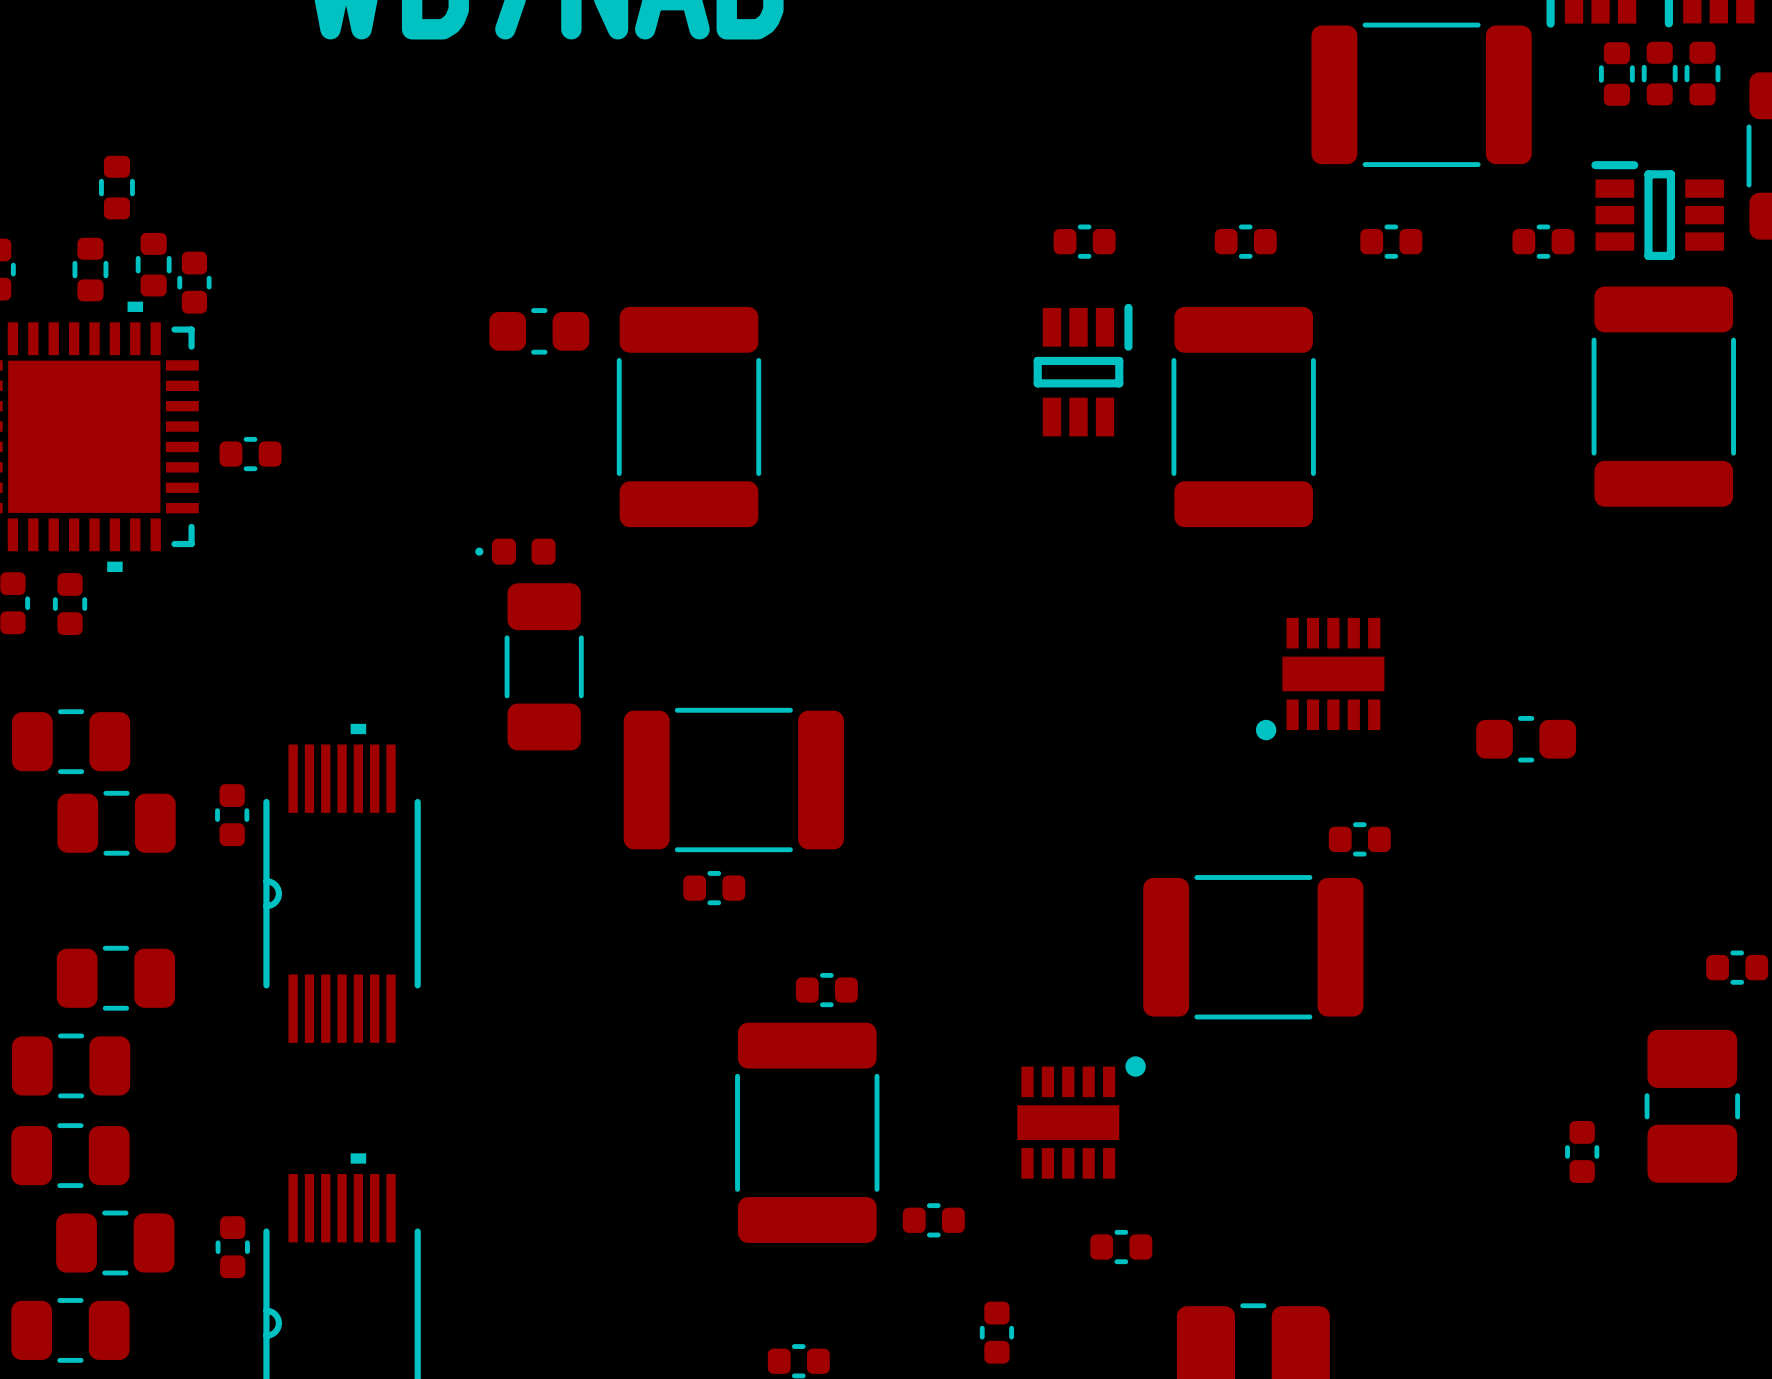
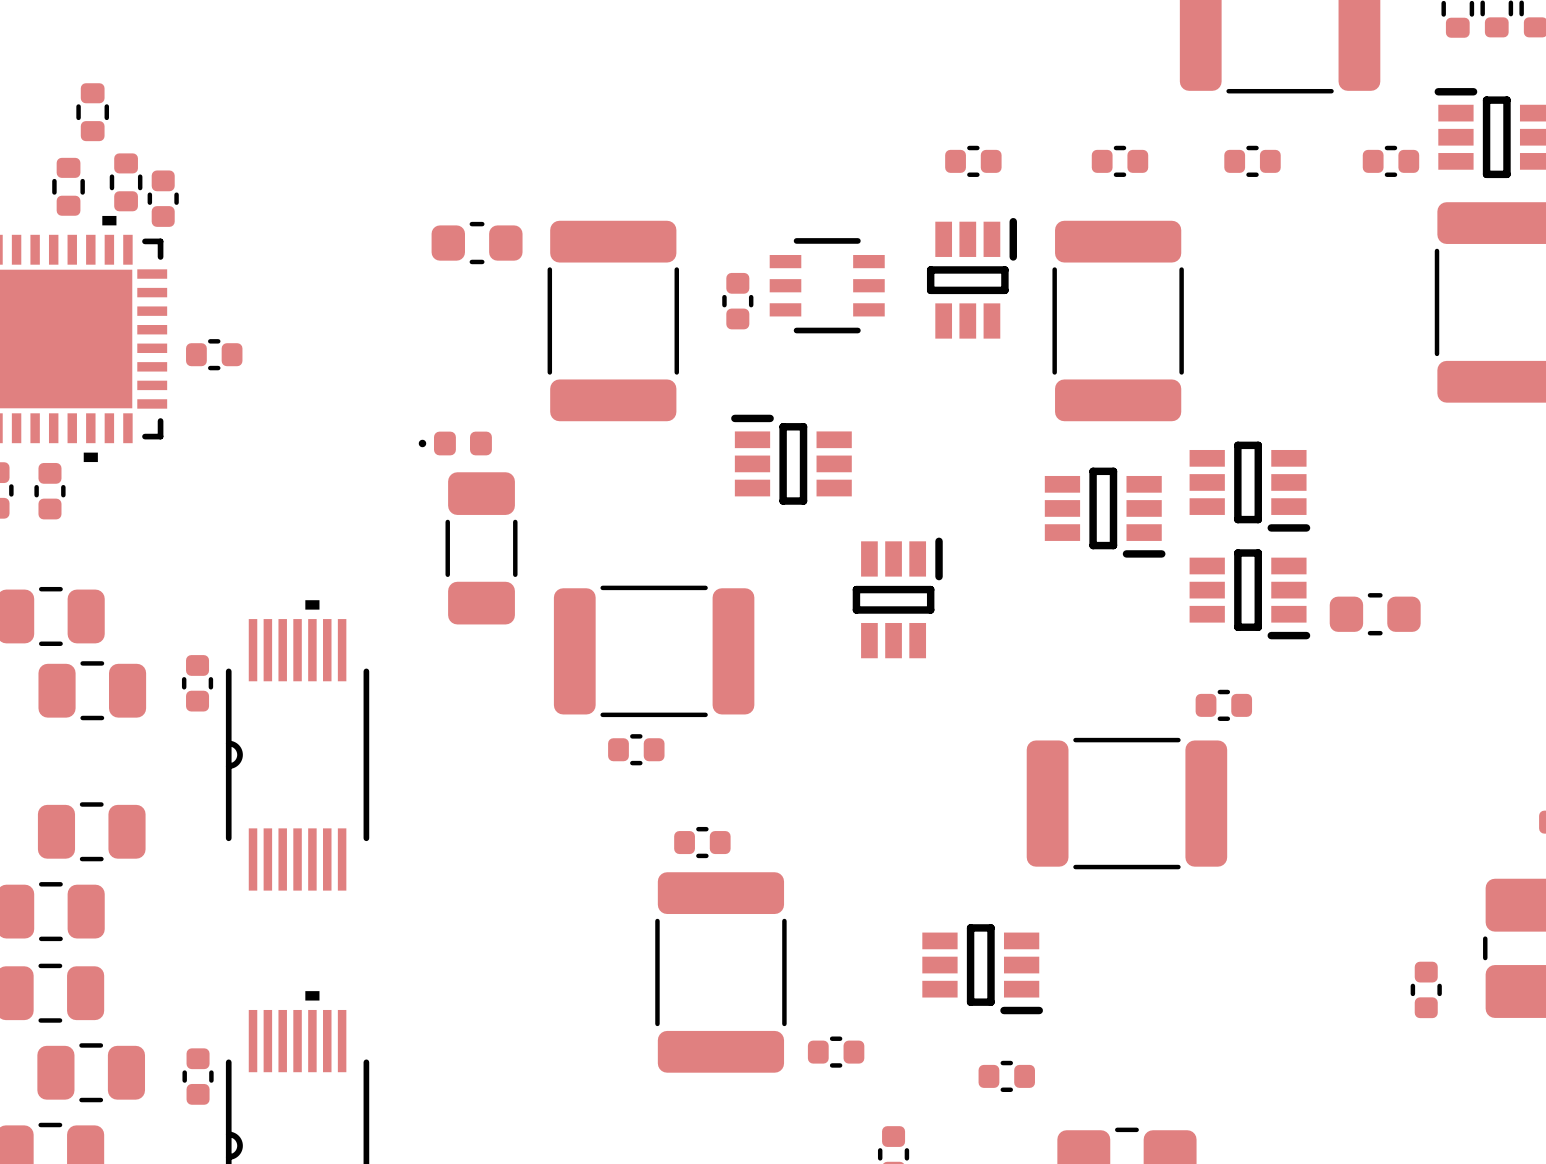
part: none -> (827, 285)
part: none -> (737, 301)
part: none -> (791, 459)
part: none -> (1249, 486)
part: none -> (1105, 512)
part: (1320, 679) -> none
part: none -> (1249, 594)
part: none -> (897, 597)
part position: (826, 990) -> (702, 842)
part footprint: [1017, 1056, 1146, 1179] -> [922, 924, 1043, 1015]

